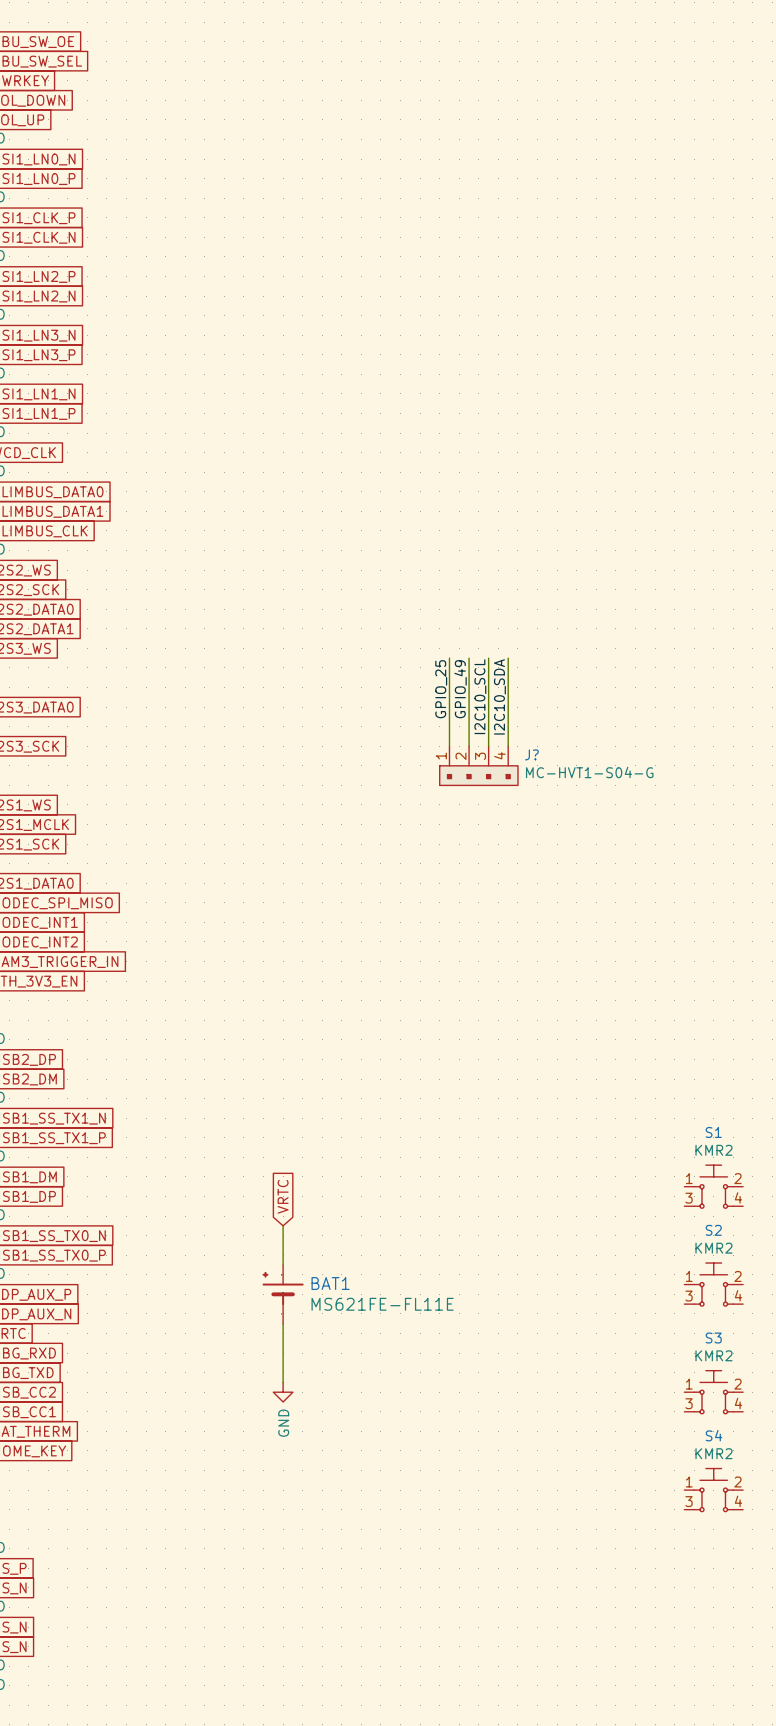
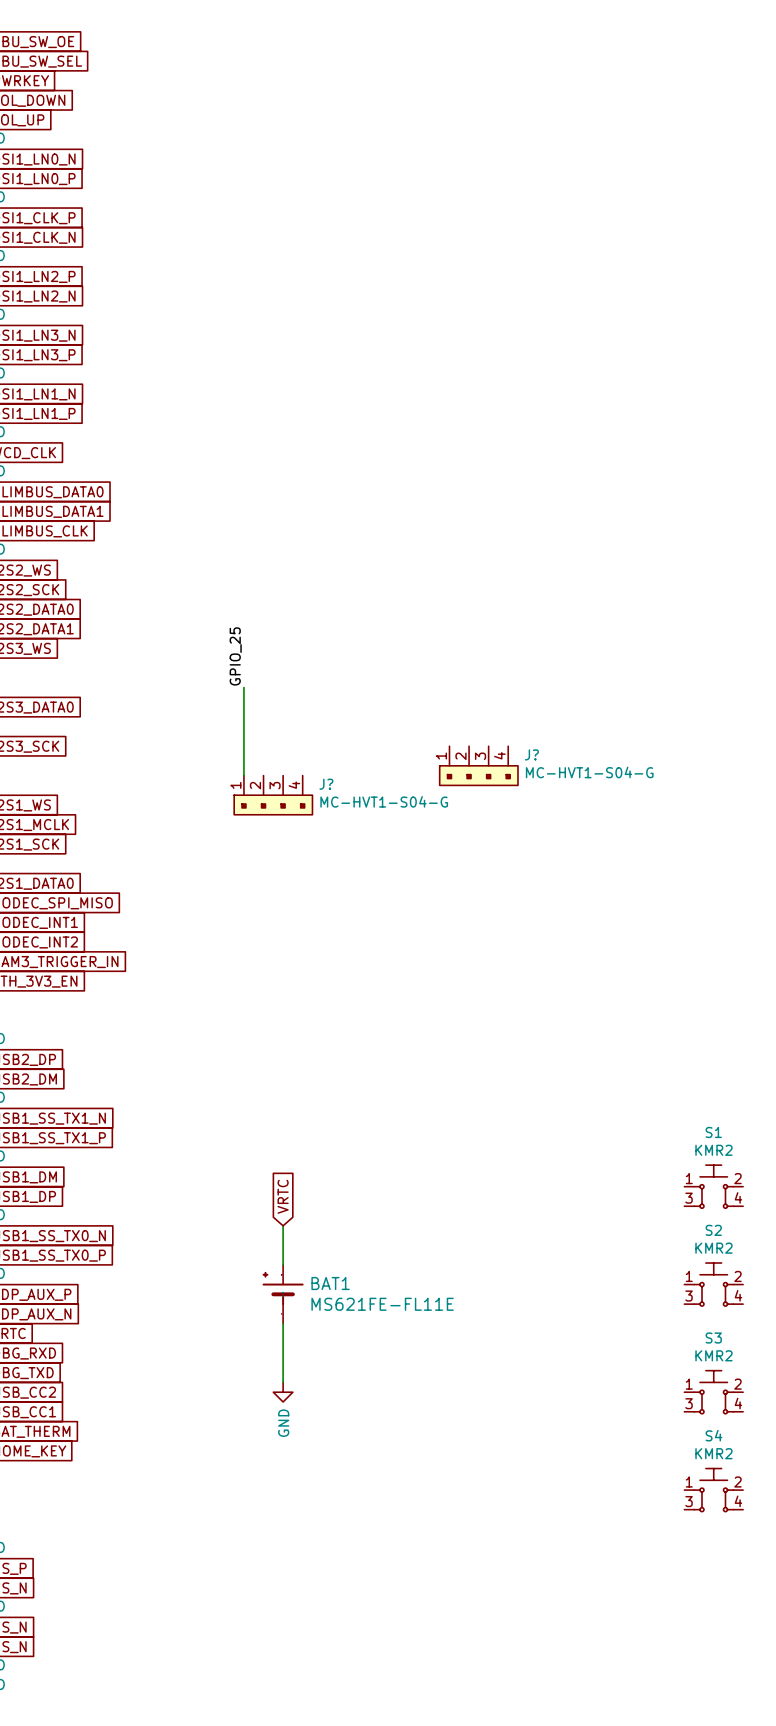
label: none -> GPIO_25 (235, 656)
wire: (449, 658) (449, 746) -> none
wire: (469, 658) (469, 746) -> none
wire: (488, 658) (488, 746) -> none
wire: (508, 658) (508, 746) -> none
wire: none -> (243, 687) (243, 775)
label: GPIO_25 (441, 689) -> none
label: GPIO_49 (460, 689) -> none
label: I2C10_SCL (480, 696) -> none
label: I2C10_SDA (499, 696) -> none
J?: none -> MC-HVT1-S04-G (273, 795)

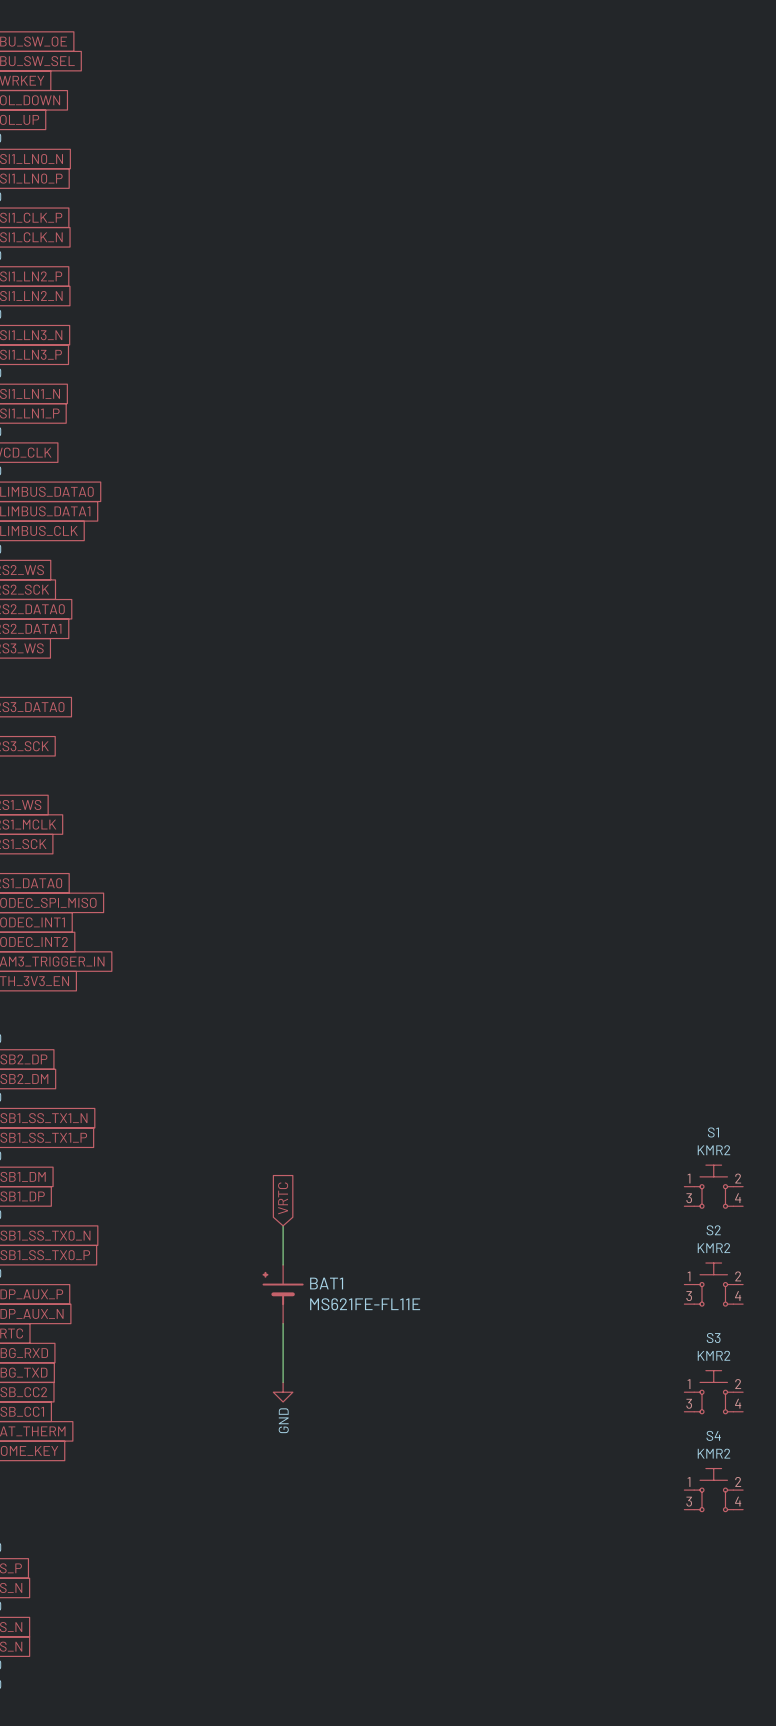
label: GPIO_25 (235, 656) -> none
wire: (243, 687) (243, 775) -> none
J?: MC-HVT1-S04-G (478, 765) -> none
J?: MC-HVT1-S04-G (273, 795) -> none

